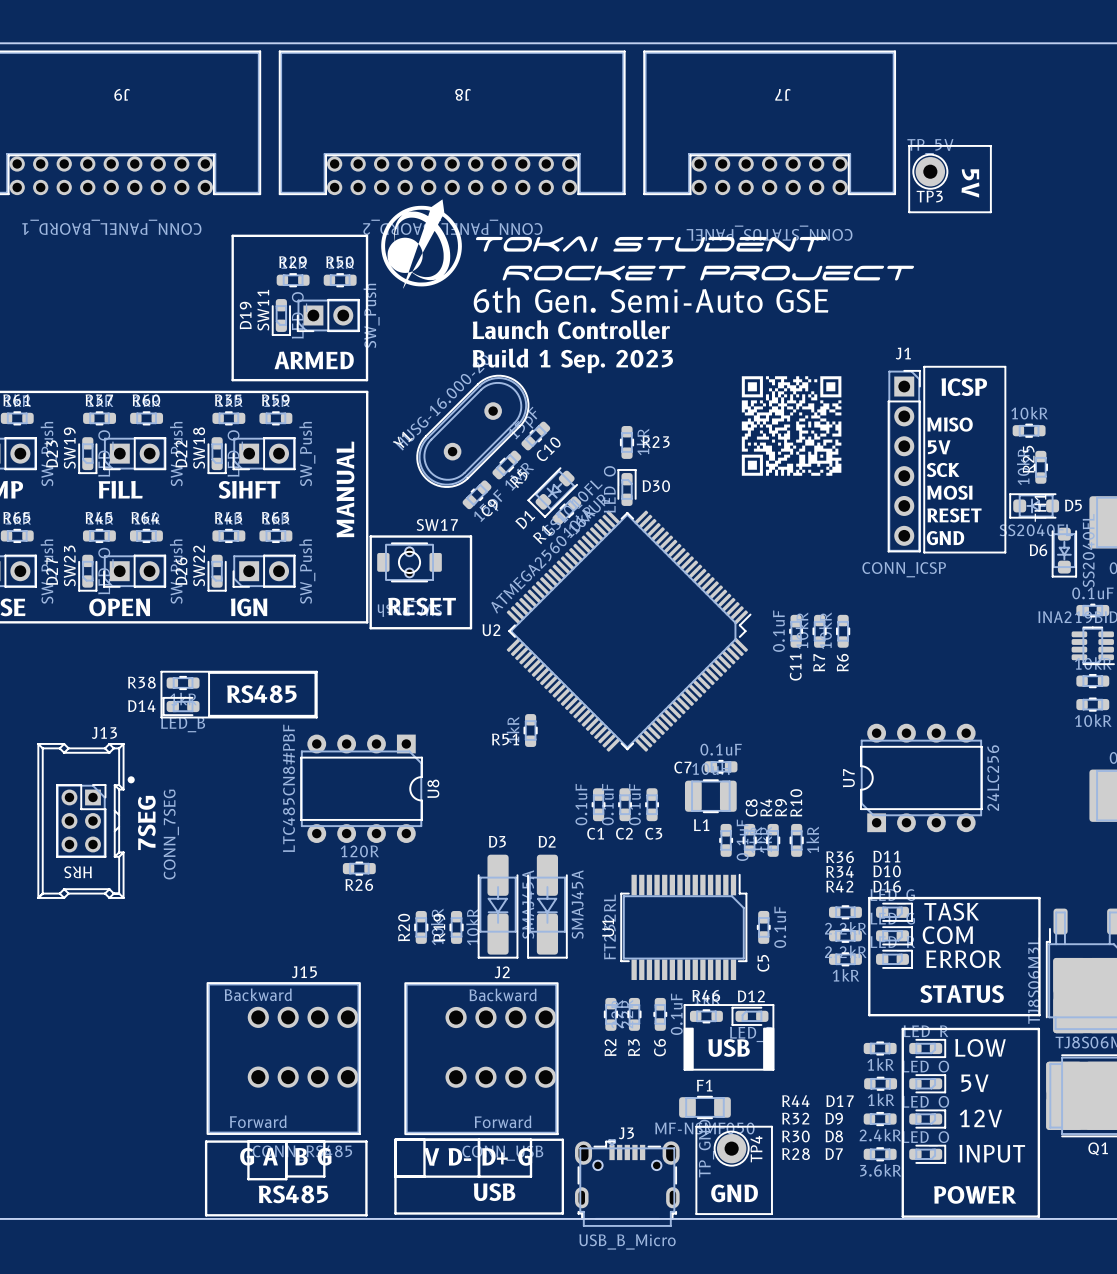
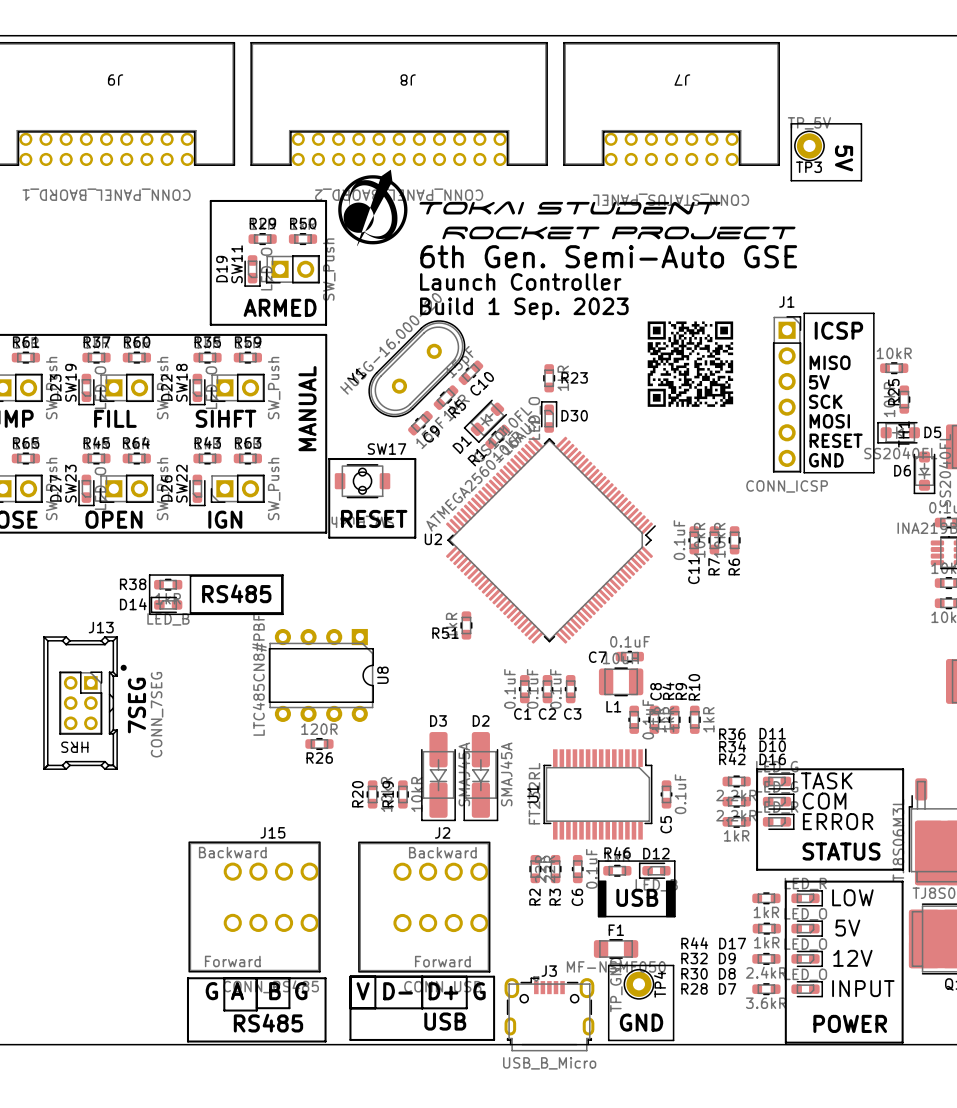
U7: 24LC256 (921, 777) -> none

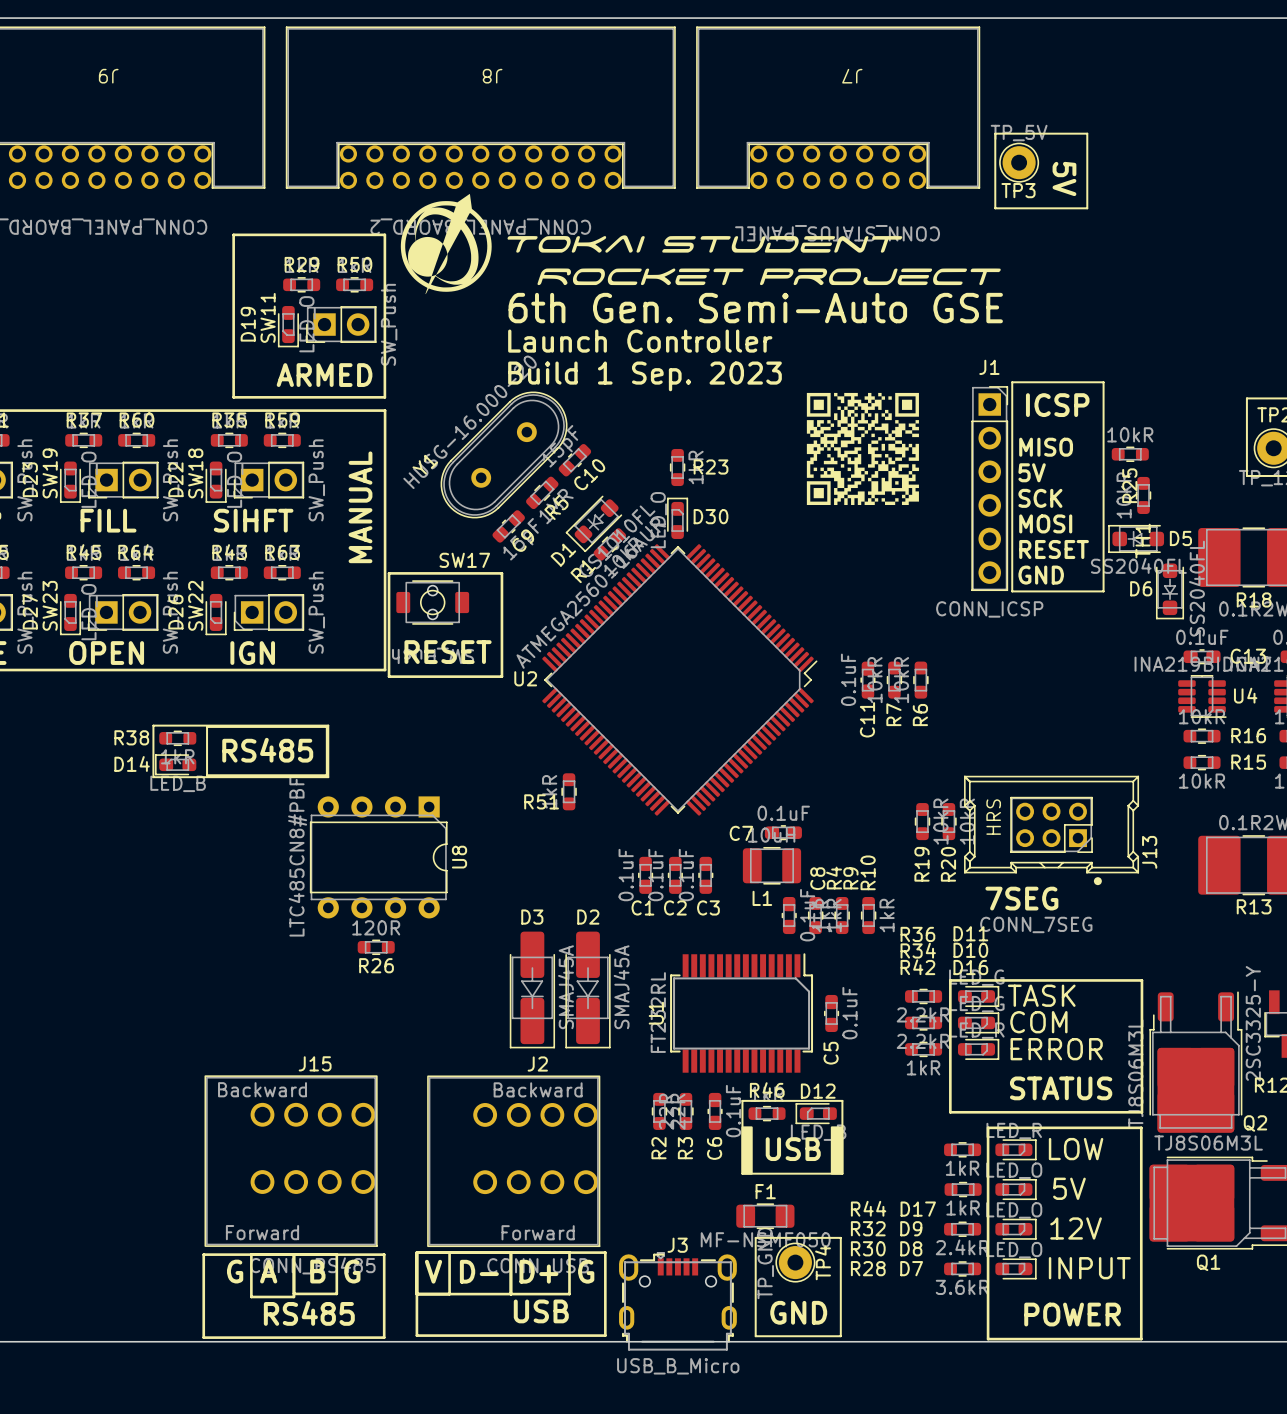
J13 rotation: 0° (85, 703) -> 90° clockwise (1051, 830)
J13 position: (85, 703) -> (1051, 830)
text: 7SEG (136, 705) -> none
text: none -> 7SEG (1021, 898)
R20 name position: R20 (357, 794) -> R20 (948, 864)
R20 position: (372, 794) -> (948, 821)
R19 name position: R19 (388, 794) -> R19 (921, 864)
R19 position: (402, 794) -> (922, 821)

